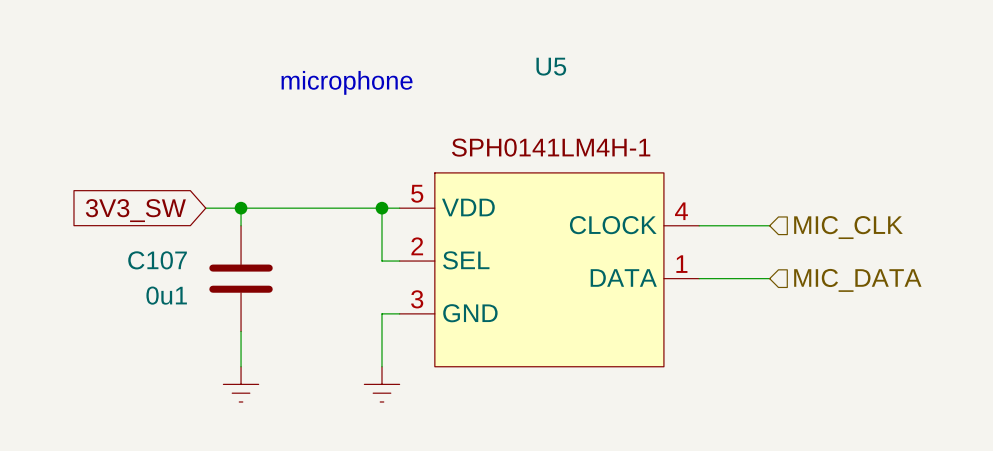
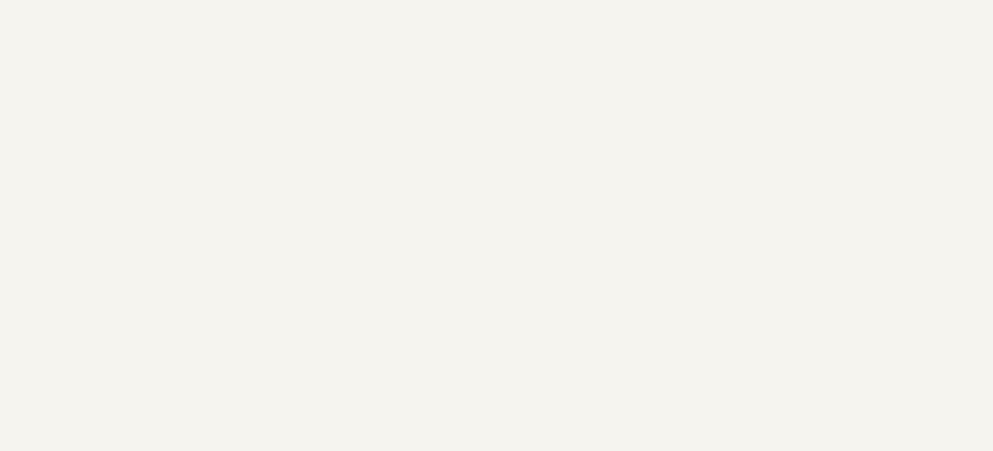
text: microphone (347, 82) -> none
wire: (205, 208) (399, 208) -> none
wire: (241, 208) (241, 225) -> none
junction: (241, 208) -> none
wire: (381, 208) (381, 261) (399, 261) -> none
junction: (381, 208) -> none
global label: 3V3_SW (135, 210) -> none
wire: (699, 225) (769, 225) -> none
hierarchical label: MIC_CLK (848, 227) -> none
U5: (549, 269) -> none
C107: 0u1 (241, 278) -> none
wire: (699, 278) (769, 278) -> none
hierarchical label: MIC_DATA (857, 280) -> none
wire: (399, 313) (381, 313) (381, 366) -> none
wire: (241, 331) (241, 366) -> none
power symbol: (241, 384) -> none
power symbol: (381, 384) -> none

